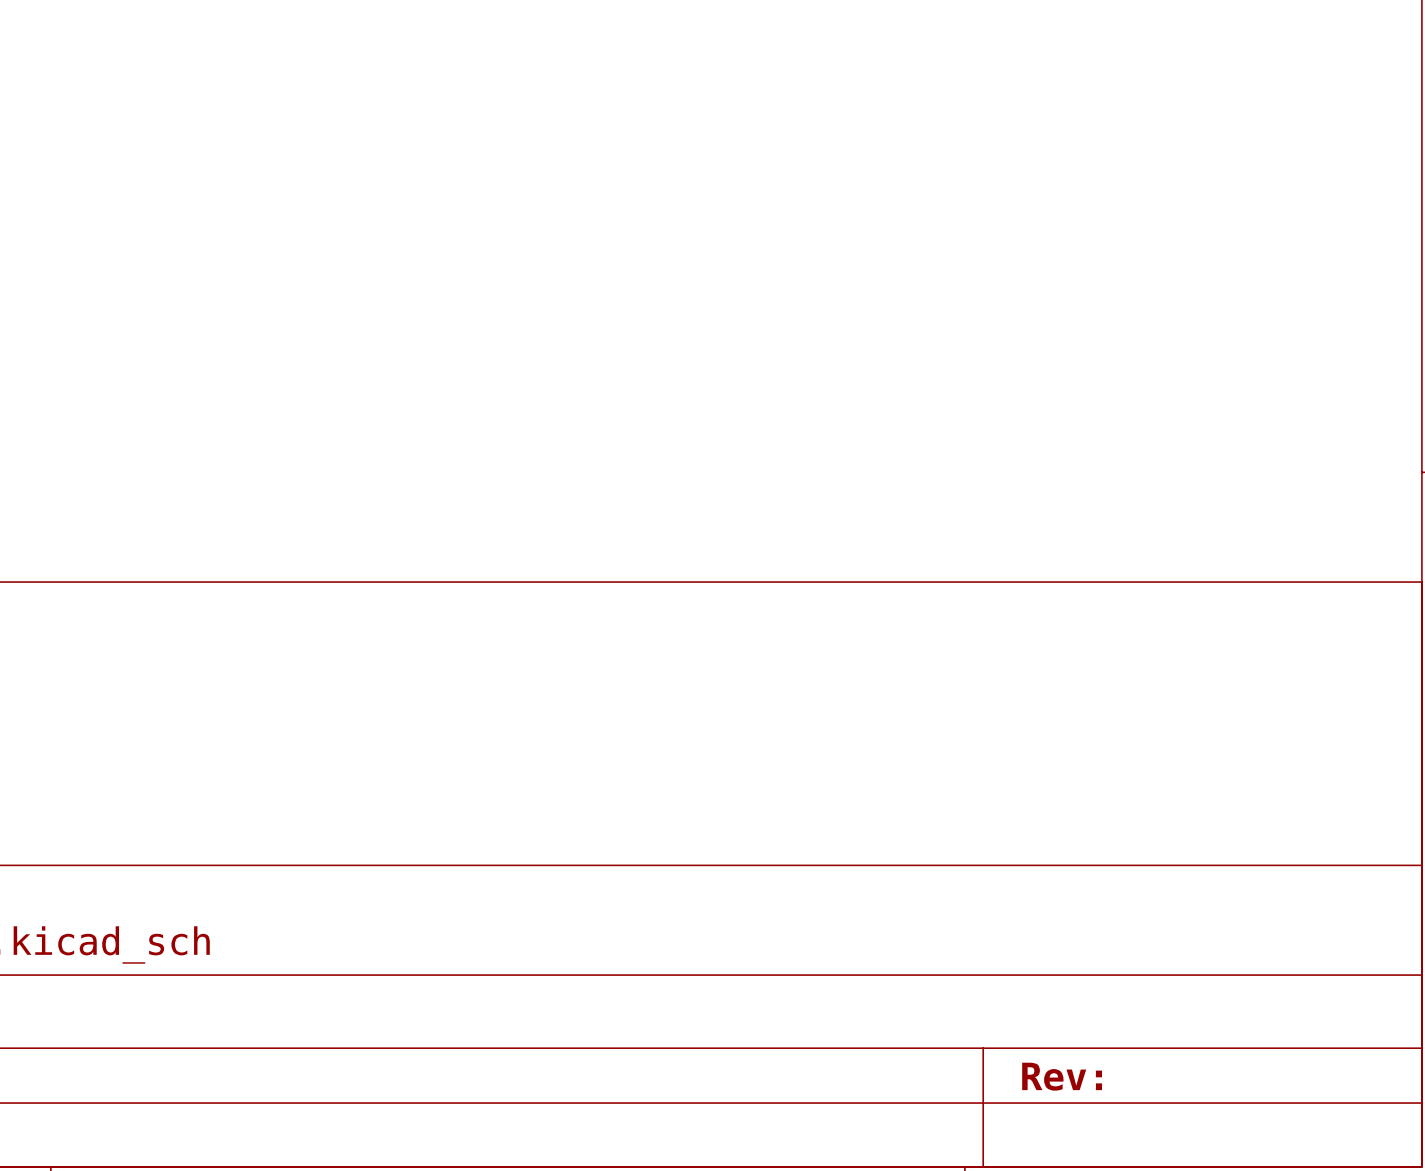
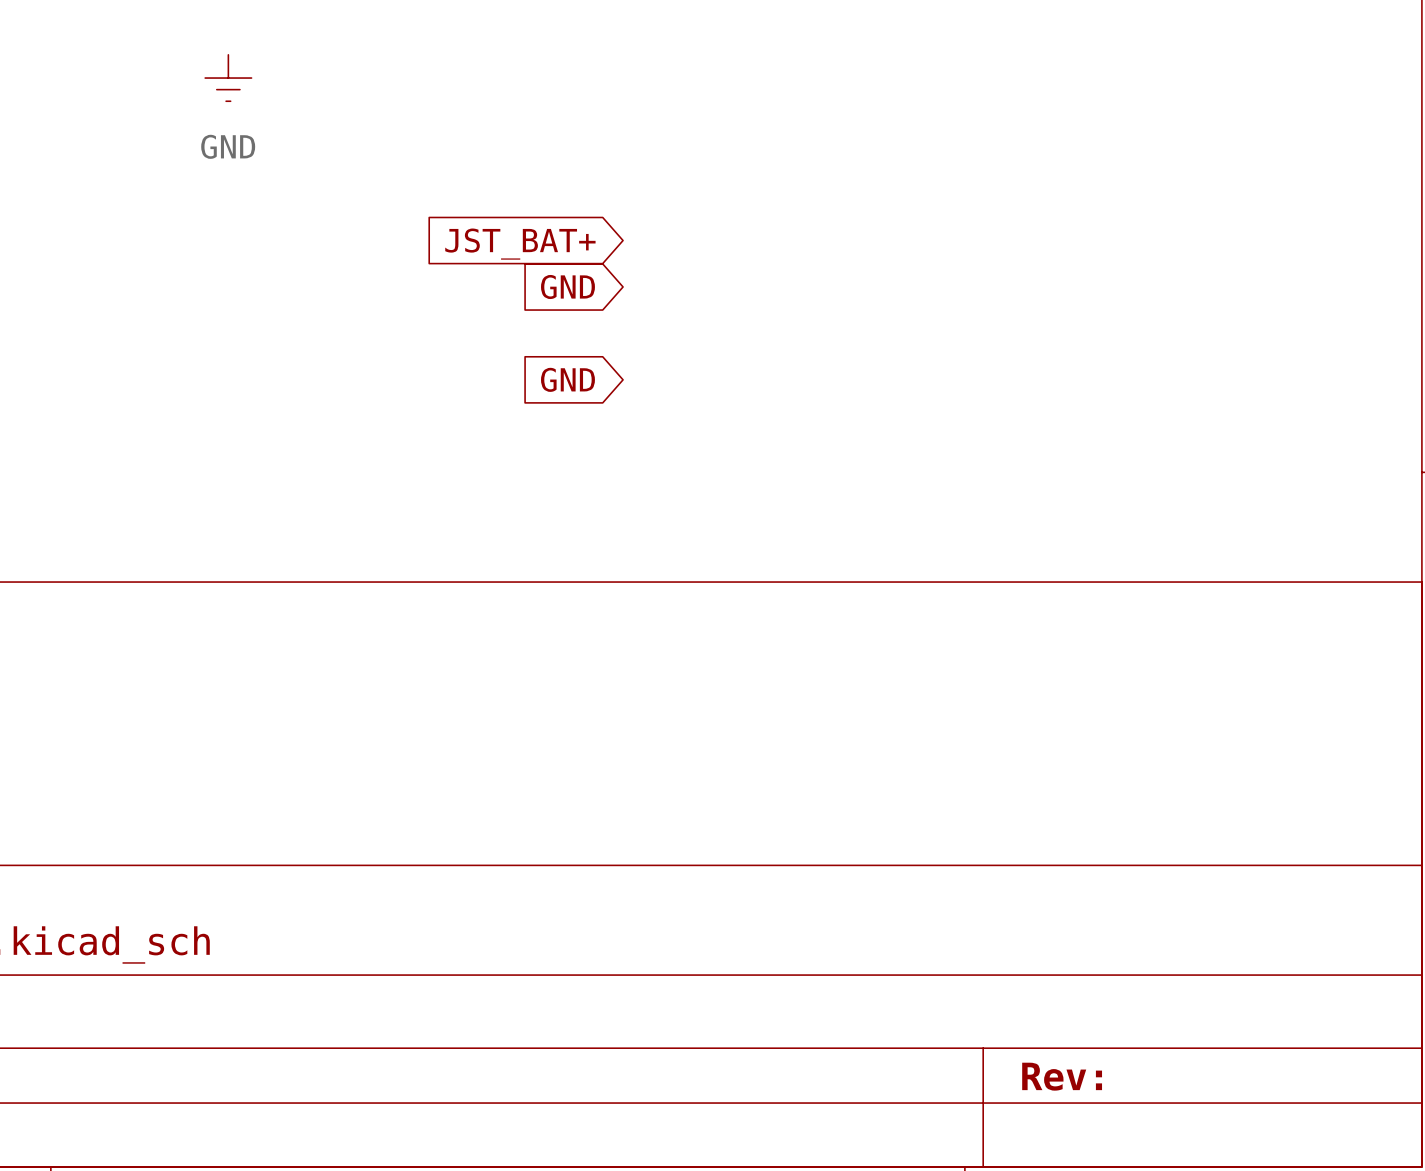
power symbol: none -> GND (228, 78)
global label: none -> JST_BAT+ (520, 244)
global label: none -> GND (567, 286)
global label: none -> GND (567, 379)

